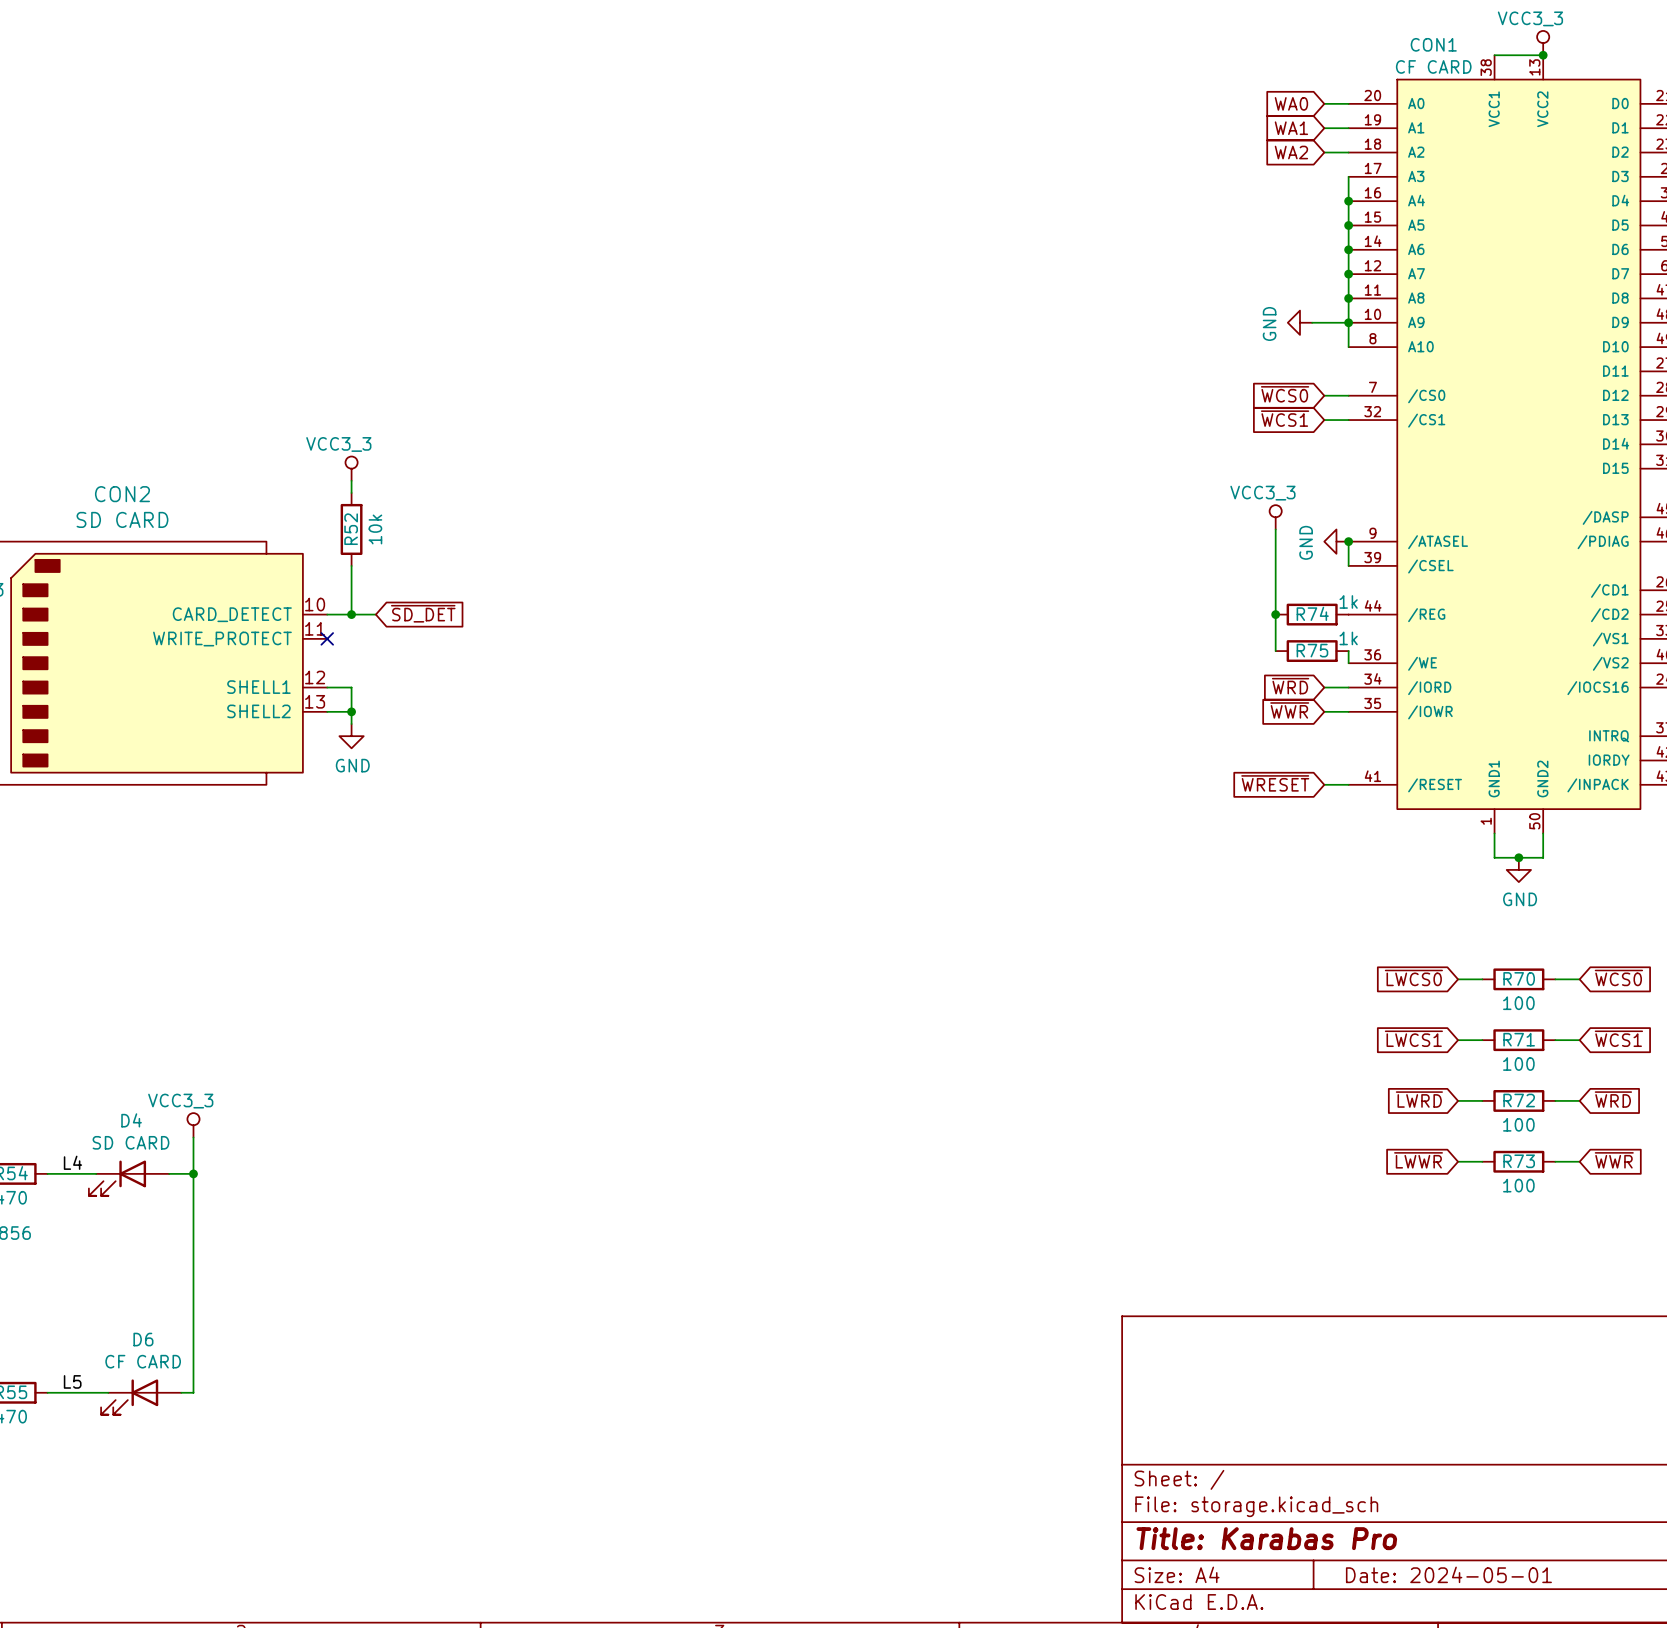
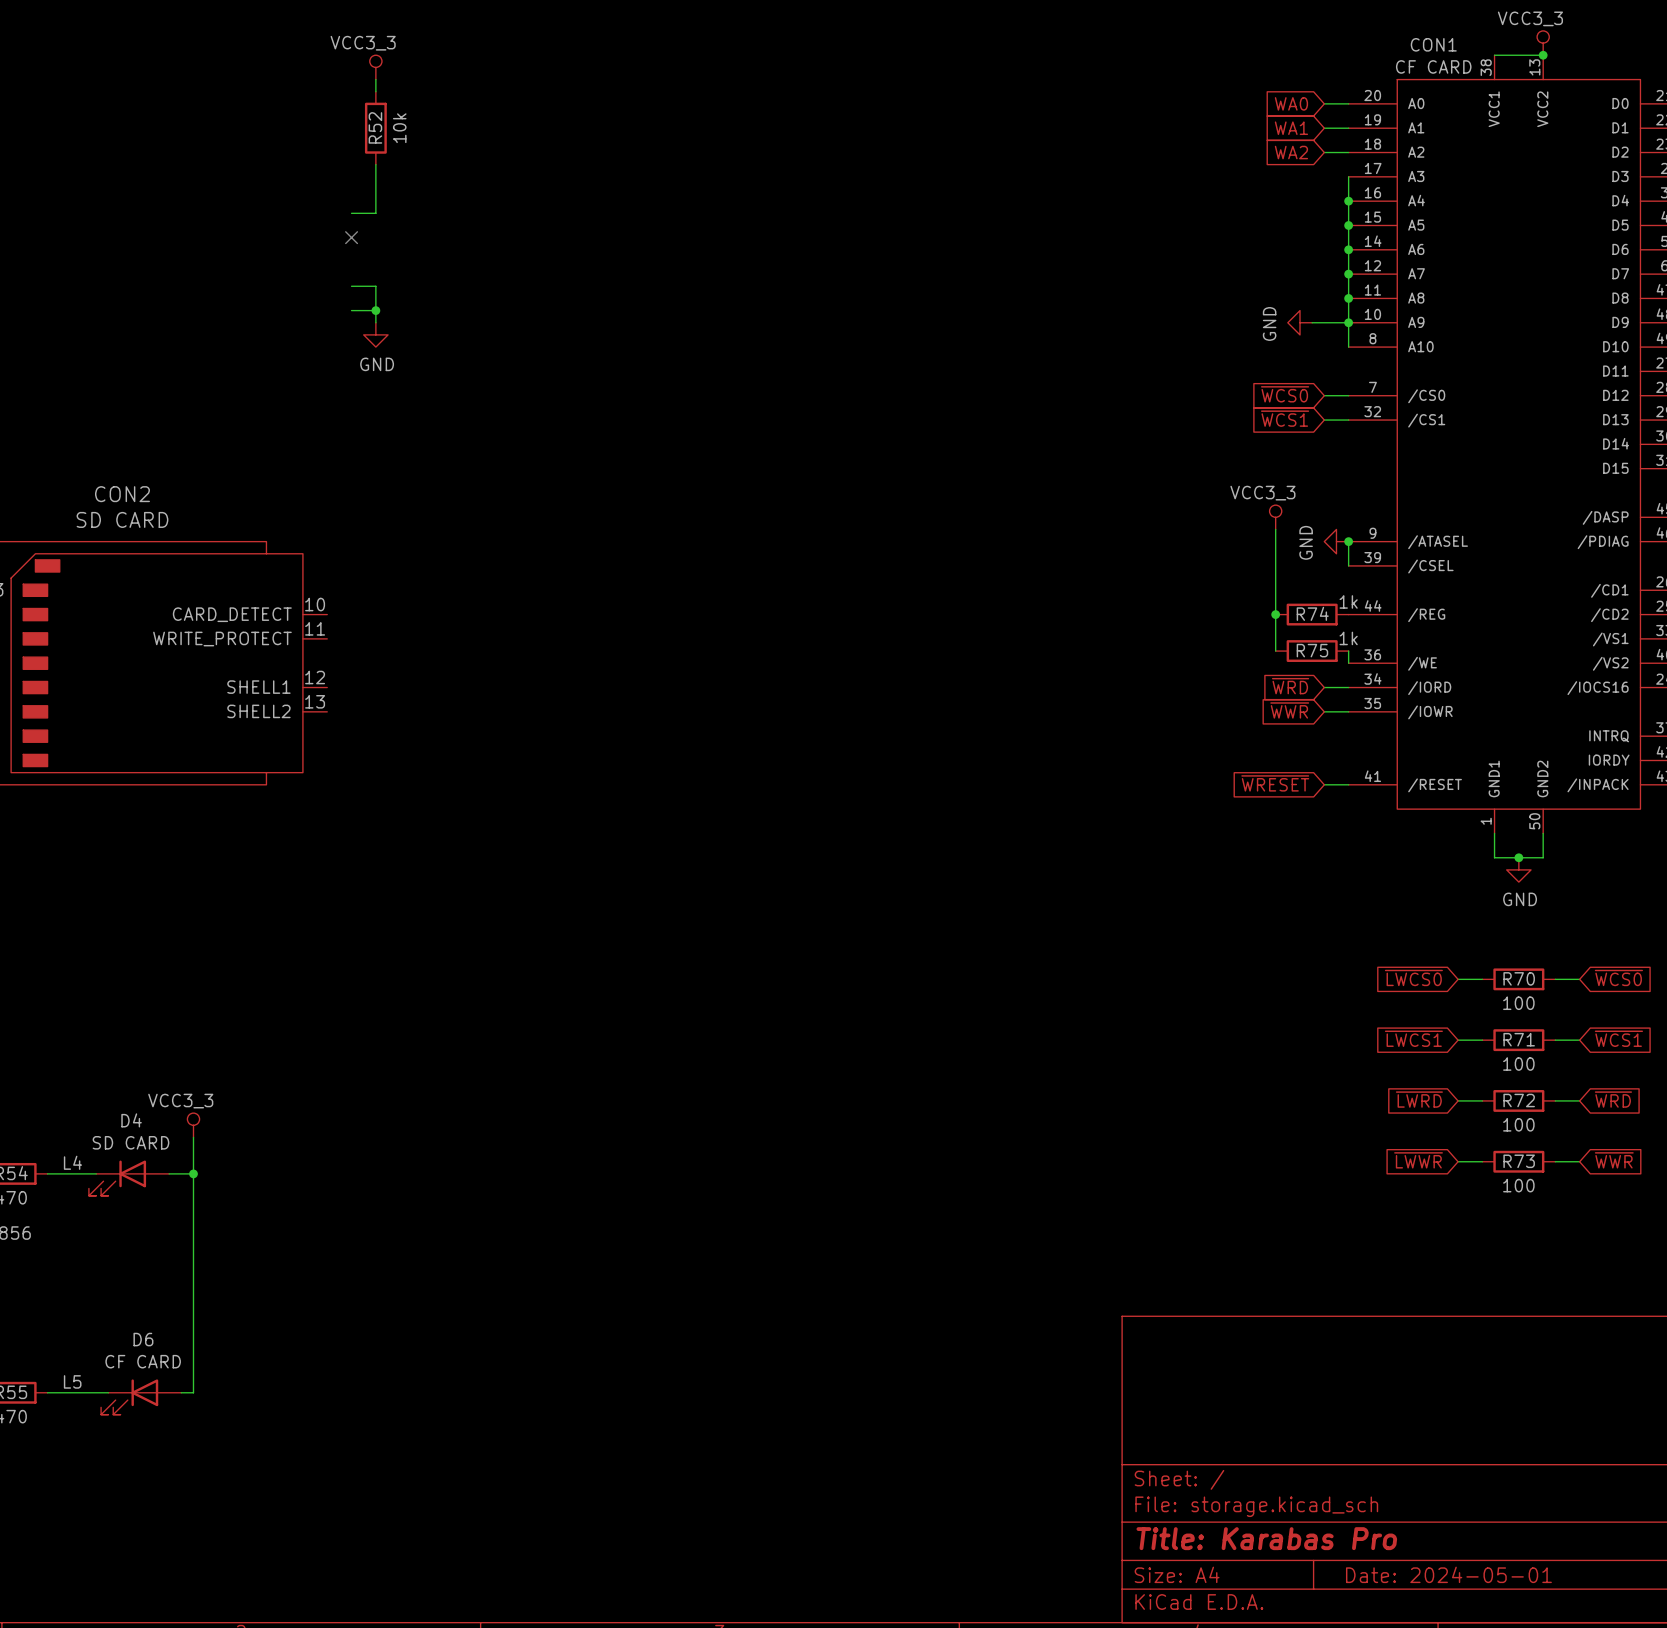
power symbol: none -> VCC3_3 (375, 67)
wire: none -> (375, 79) (375, 91)
wire: none -> (375, 164) (375, 213) (351, 213)
no-connect mark: none -> (351, 237)
wire: none -> (351, 286) (375, 286) (375, 322)
wire: none -> (351, 310) (375, 310)
junction: none -> (375, 310)
power symbol: none -> GND (375, 334)
power symbol: VCC3_3 (351, 468) -> none
wire: (351, 480) (351, 492) -> none
R52 position: (351, 529) -> (375, 128)
wire: (351, 565) (351, 614) -> none
global label: ~{SD_DET} (423, 613) -> none
wire: (327, 614) (375, 614) -> none
junction: (351, 614) -> none
no-connect mark: (327, 638) -> none
wire: (327, 687) (351, 687) (351, 724) -> none
wire: (327, 711) (351, 711) -> none
junction: (351, 711) -> none
power symbol: GND (351, 736) -> none

